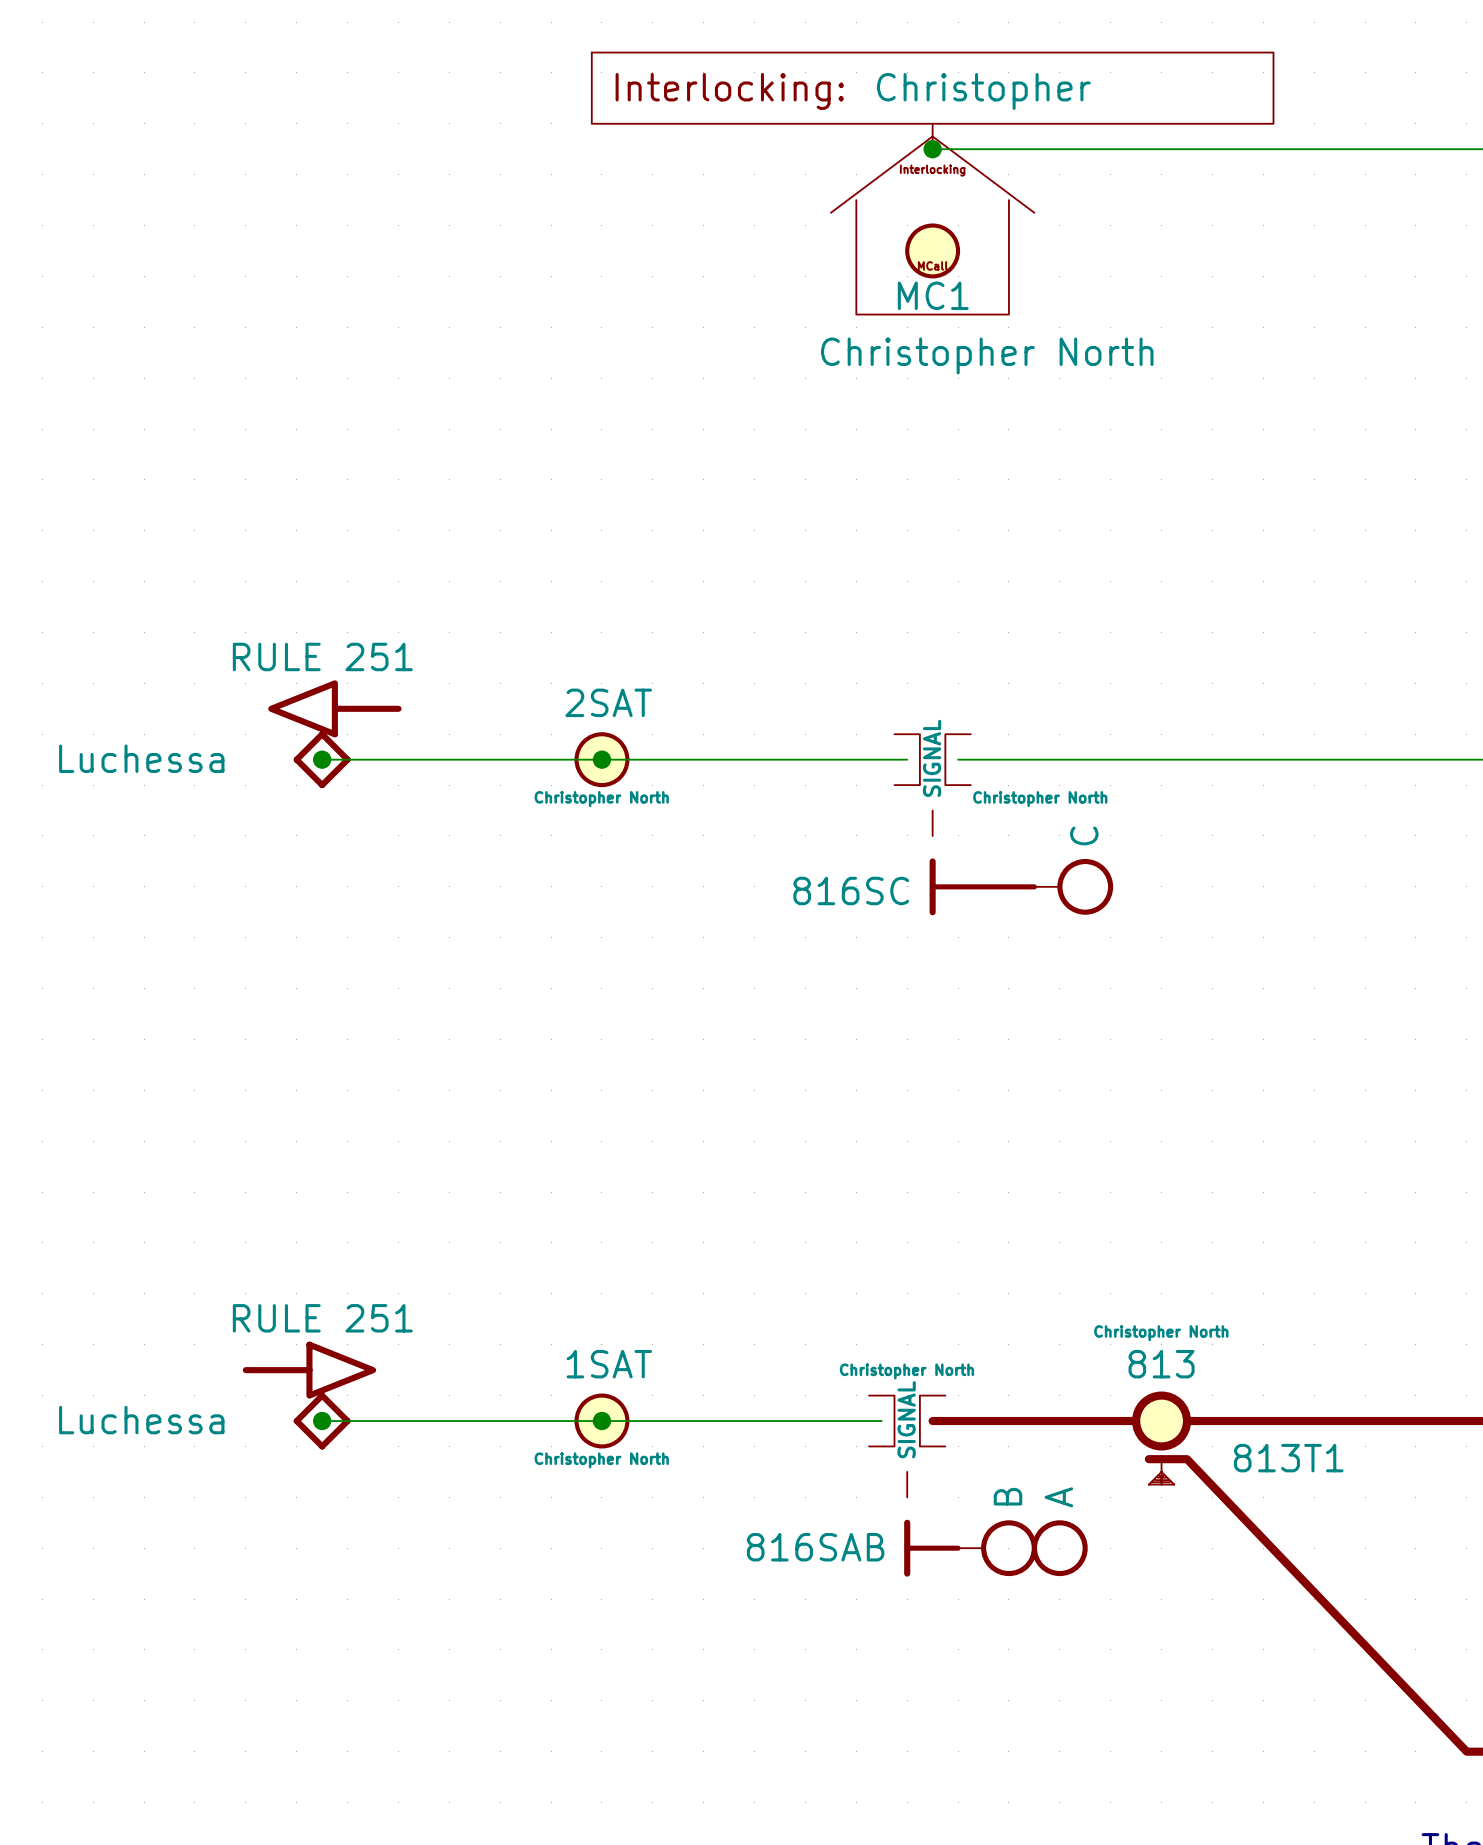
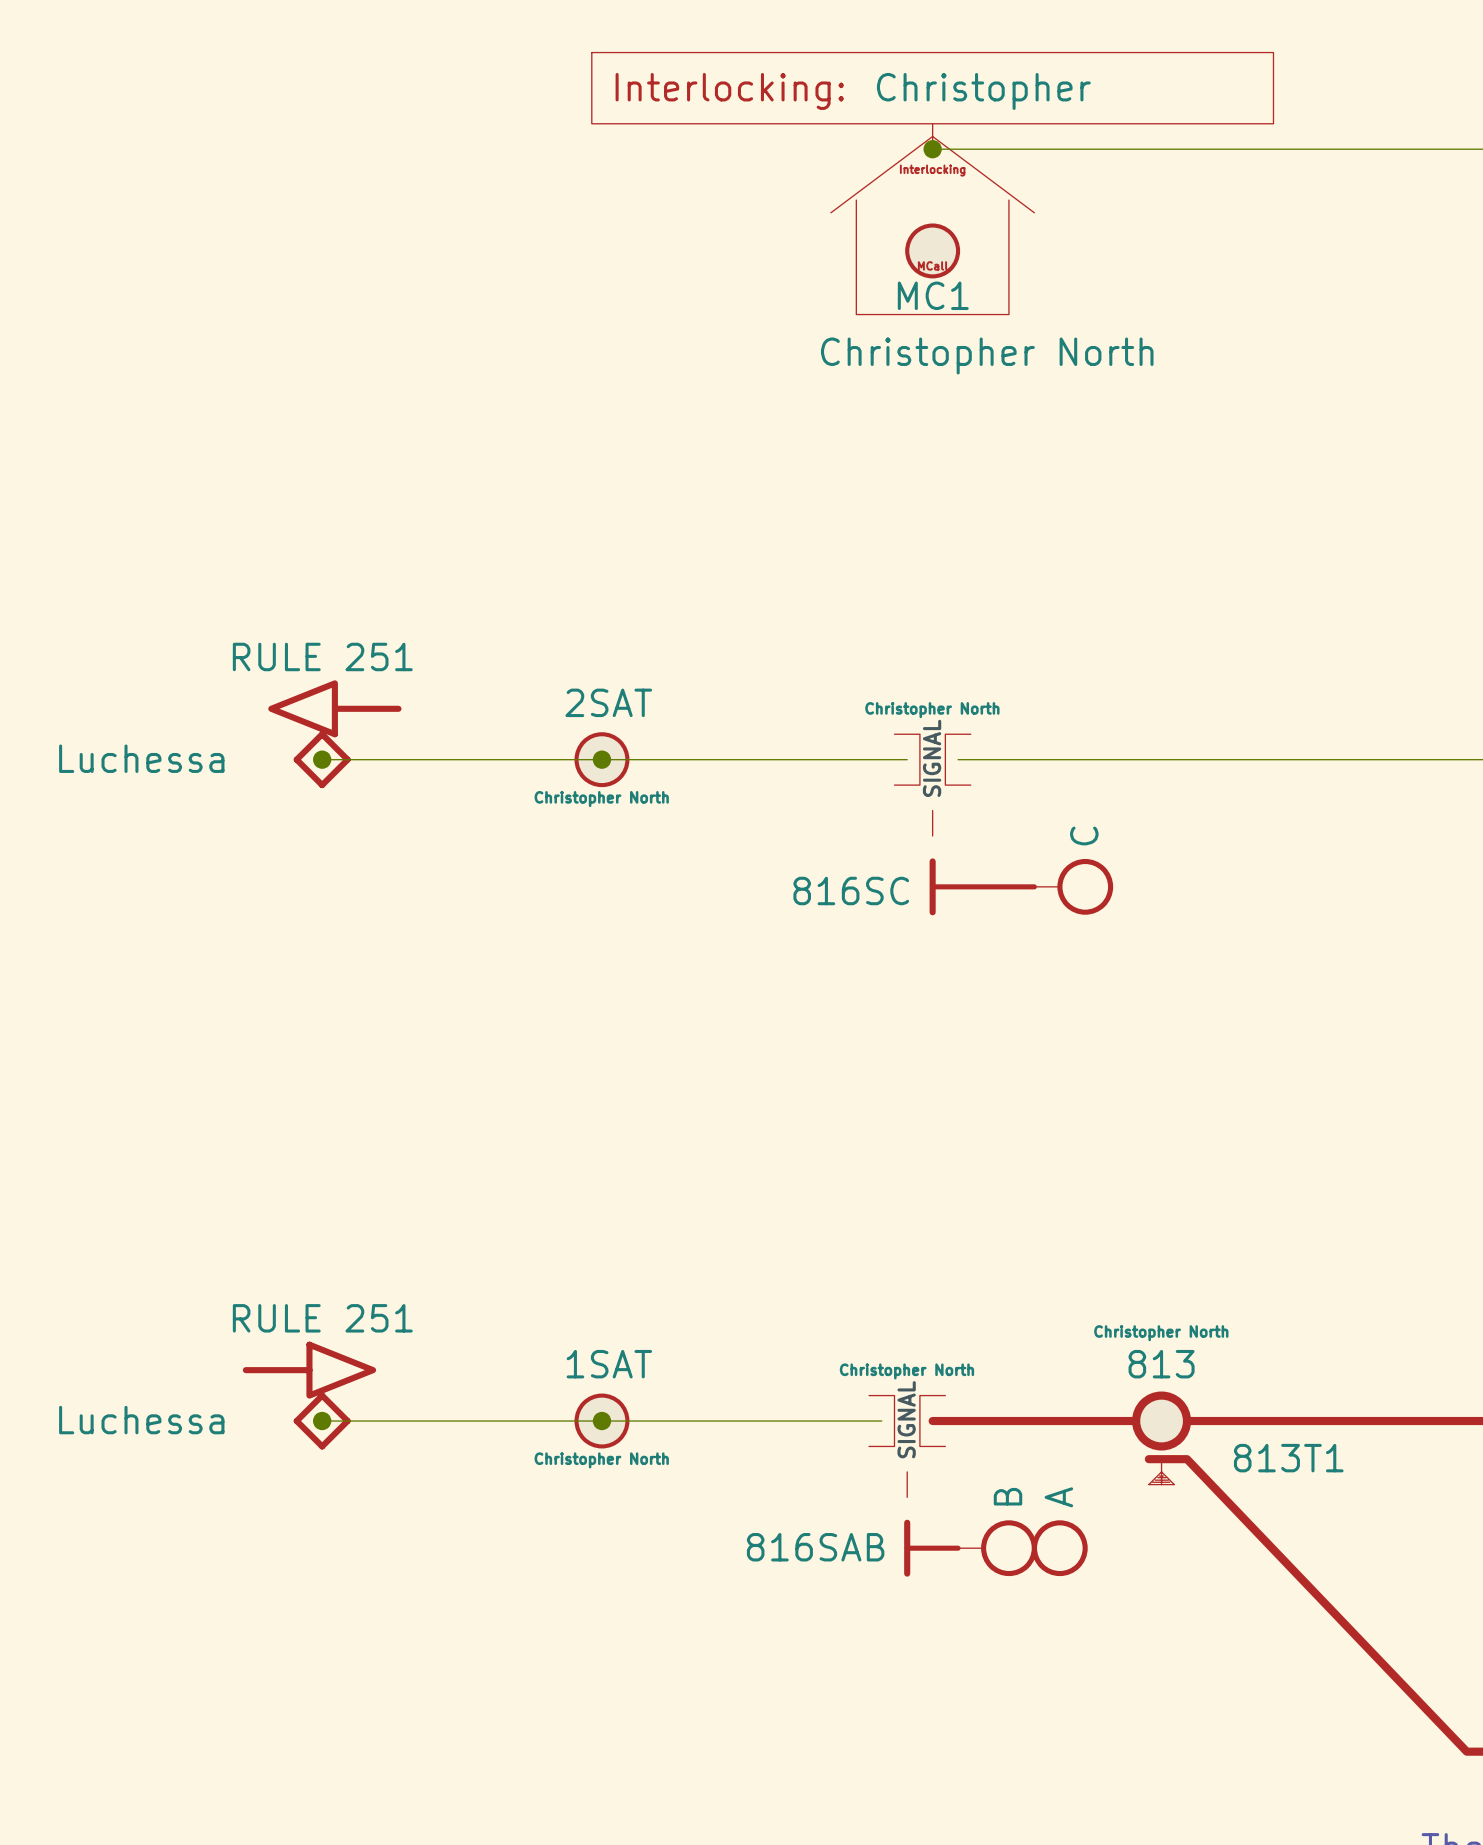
part text position: Christopher North (1040, 799) -> Christopher North (932, 710)

